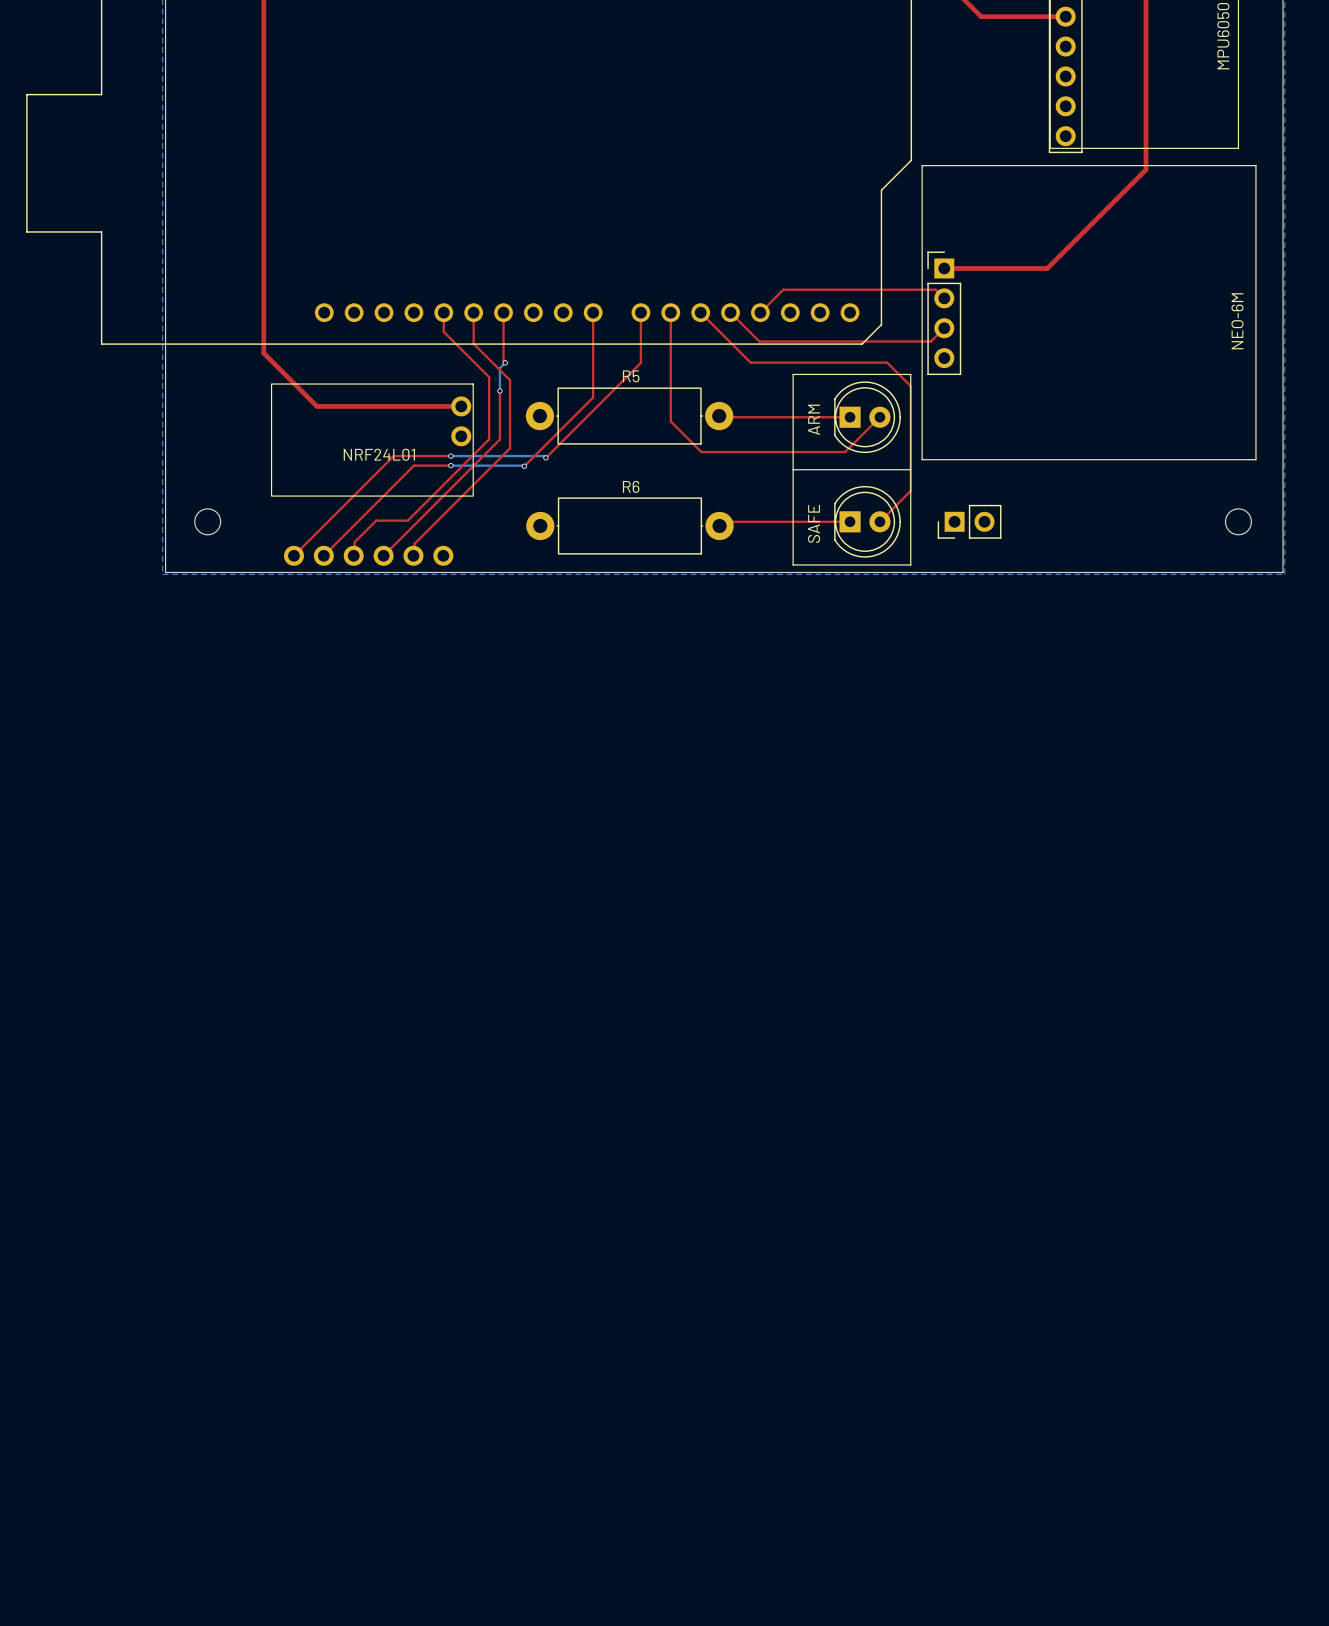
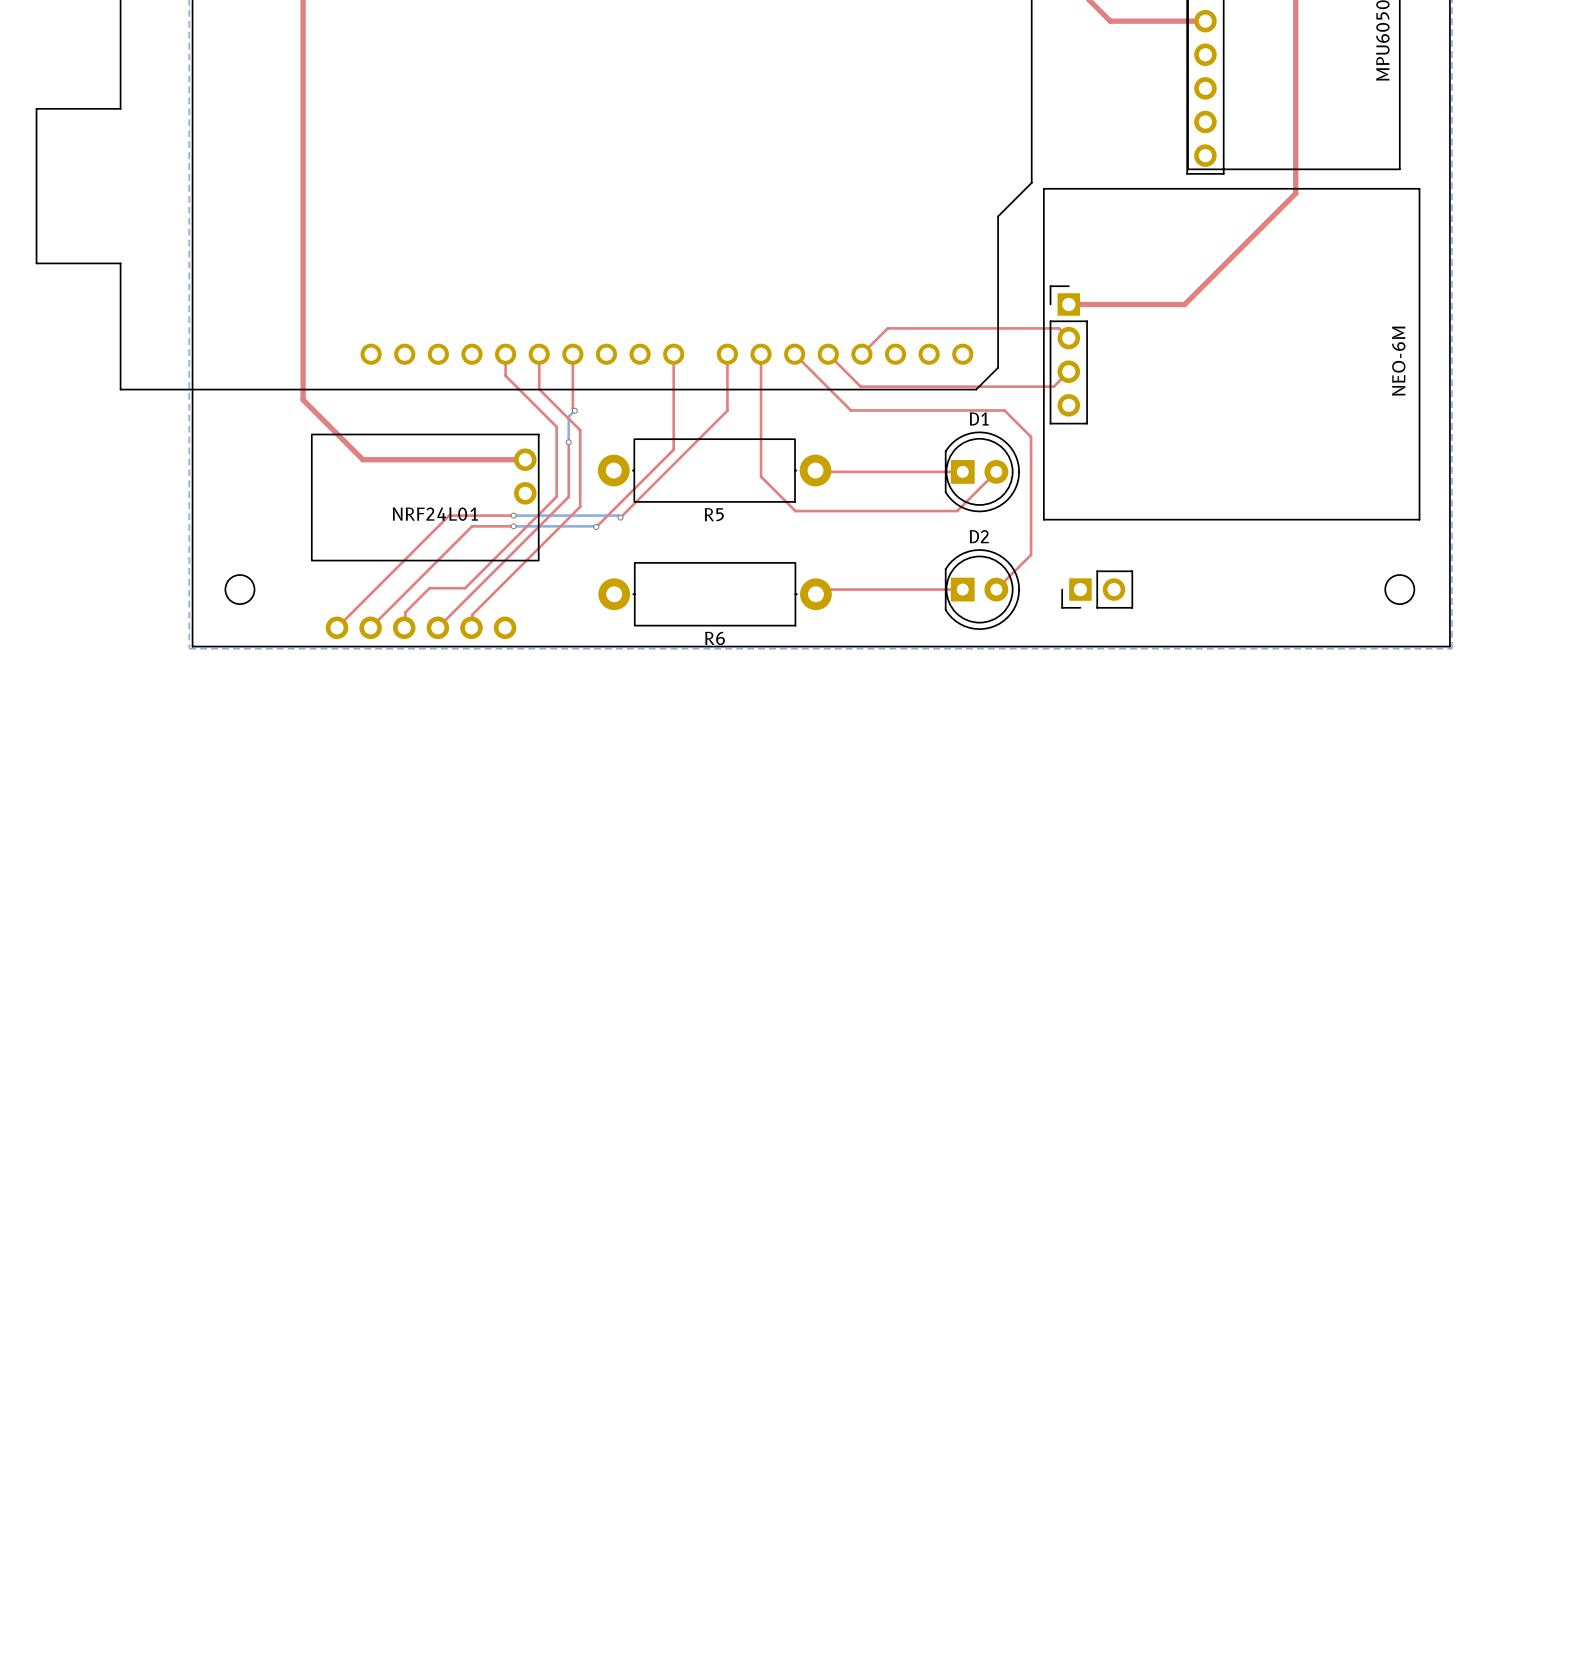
D1 name: none -> D1 (979, 418)
line: (793, 374) (910, 374) (910, 564) (793, 564) (793, 374) -> none
R5 name position: R5 (631, 376) -> R5 (714, 514)
text: ARM (814, 419) -> none
line: (793, 469) (910, 469) -> none
D2 name: none -> D2 (979, 536)
R6 name position: R6 (631, 486) -> R6 (715, 638)
text: SAFE (814, 523) -> none

